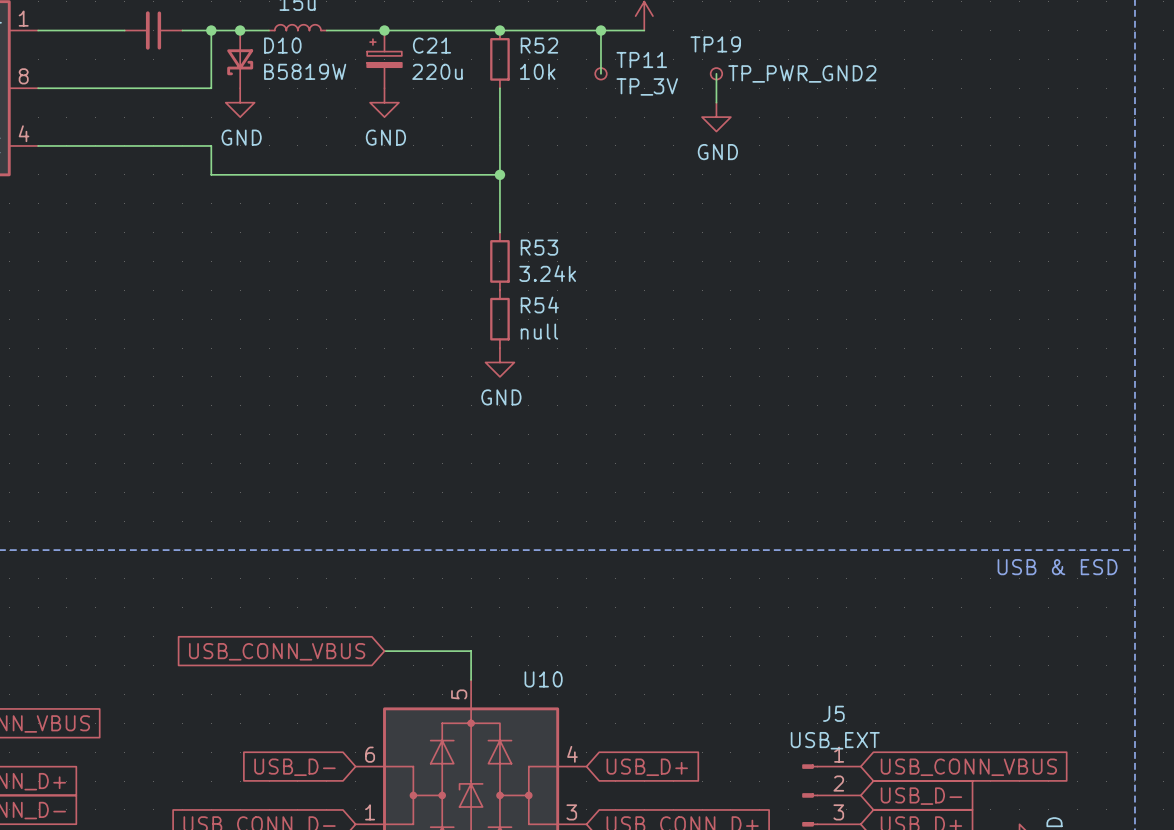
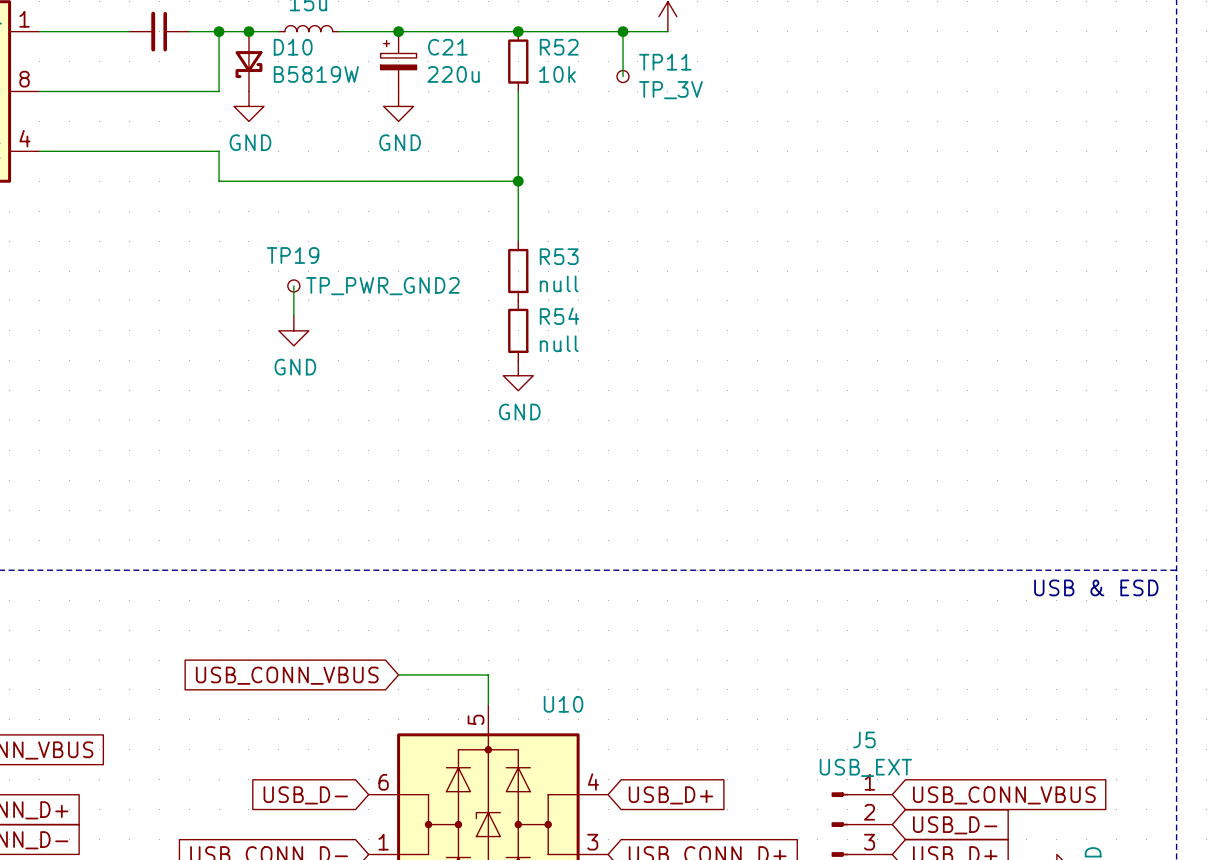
wire: (716, 73) (716, 102) -> none
TP19 position: (716, 73) -> (293, 285)
power symbol: GND (716, 117) -> none
R53 value: 3.24k (547, 273) -> null (559, 283)
wire: none -> (293, 285) (293, 315)
power symbol: none -> GND (293, 330)

